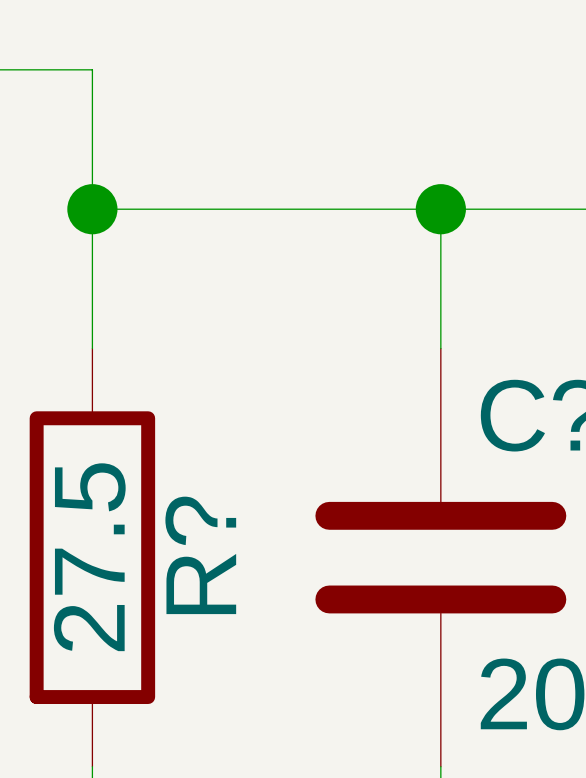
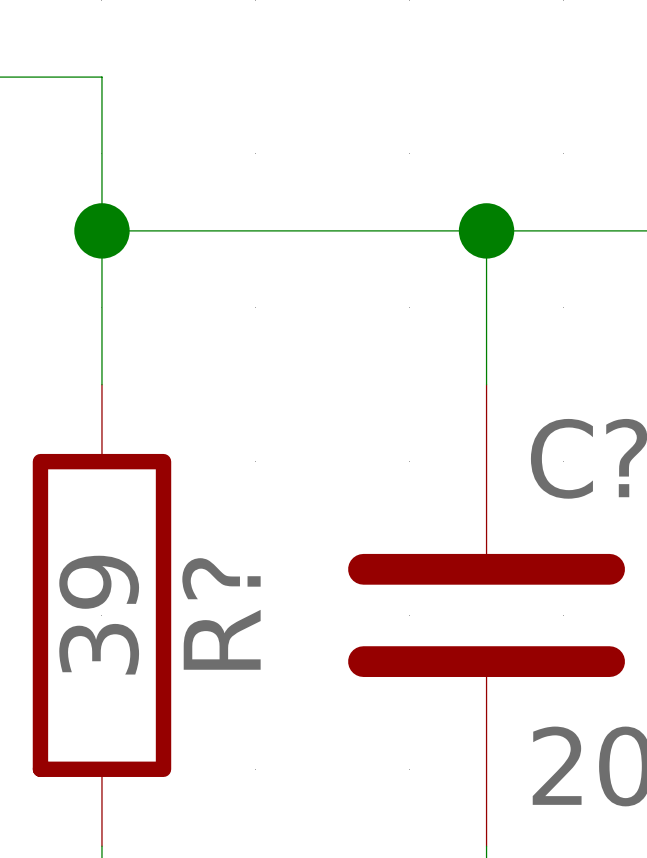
R? value: 27.5 (89, 557) -> 39 (99, 615)

